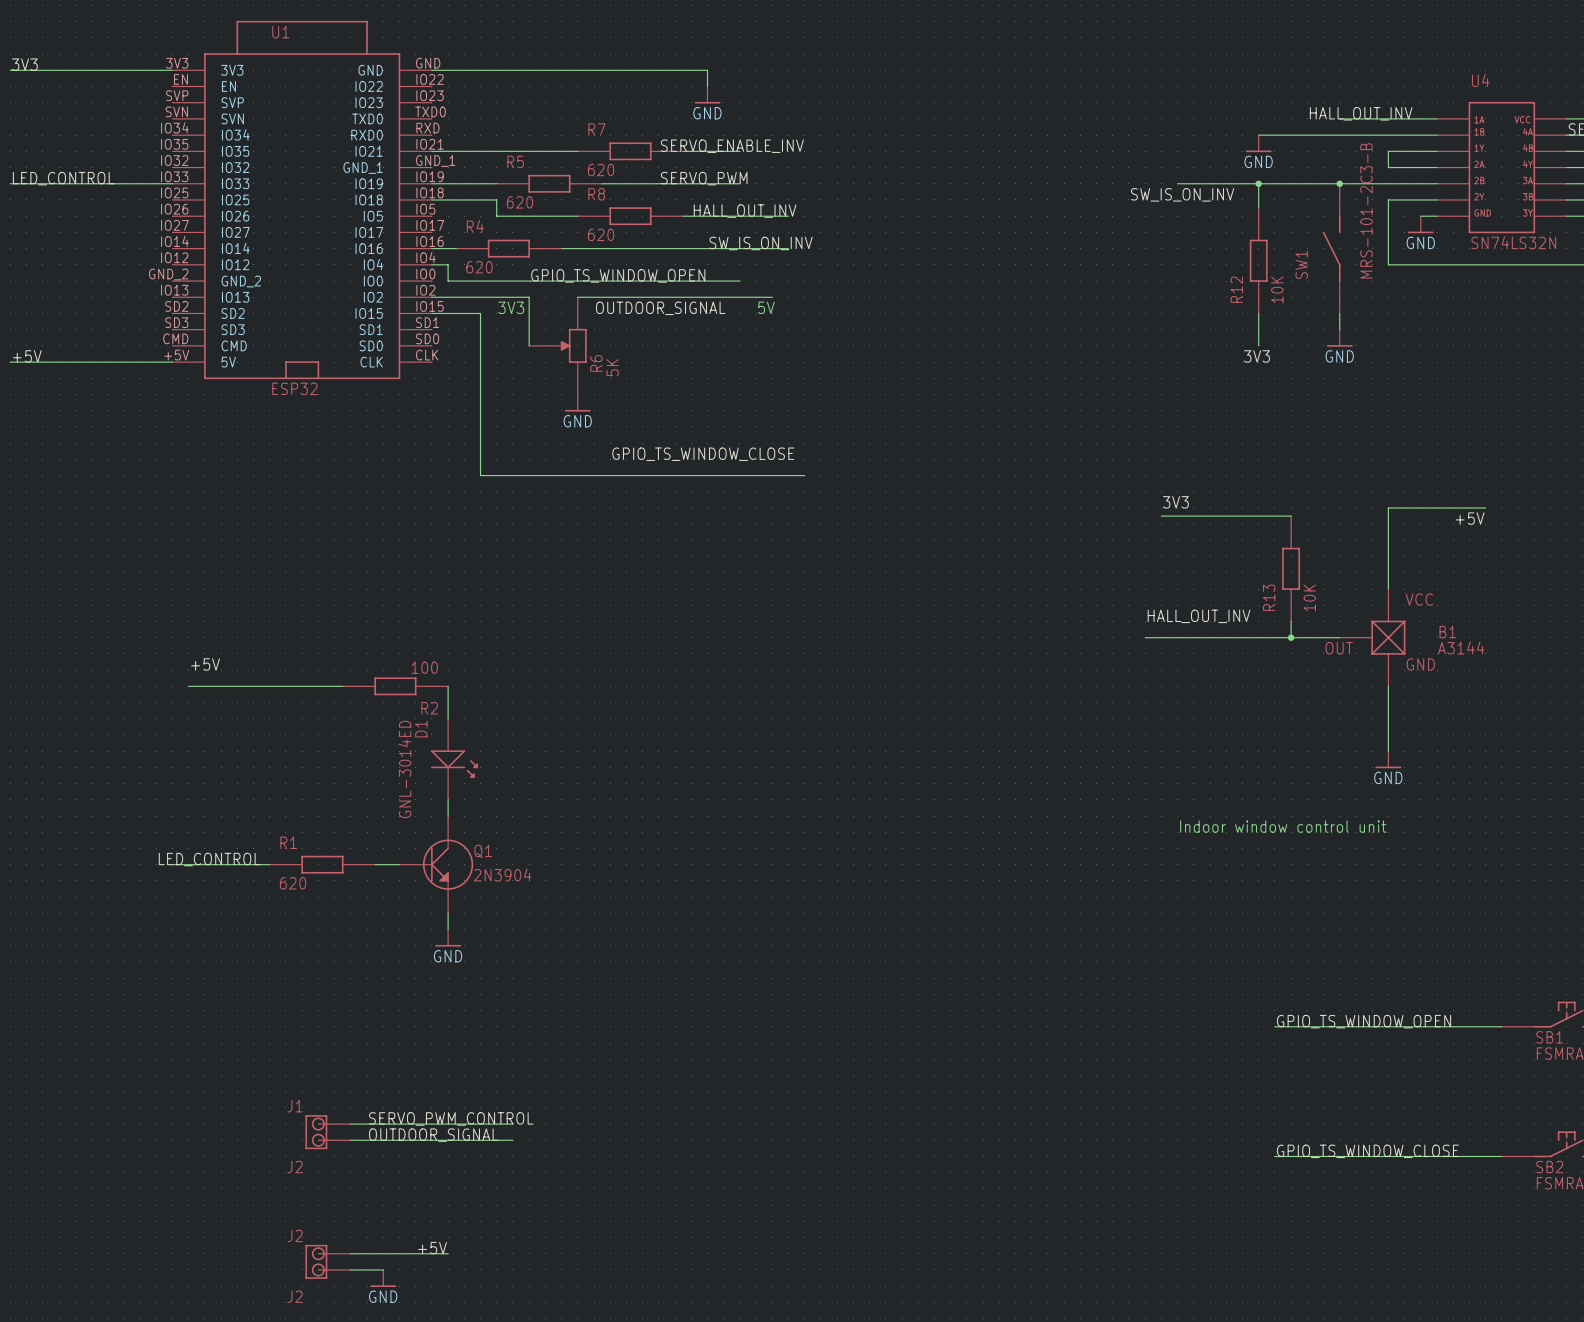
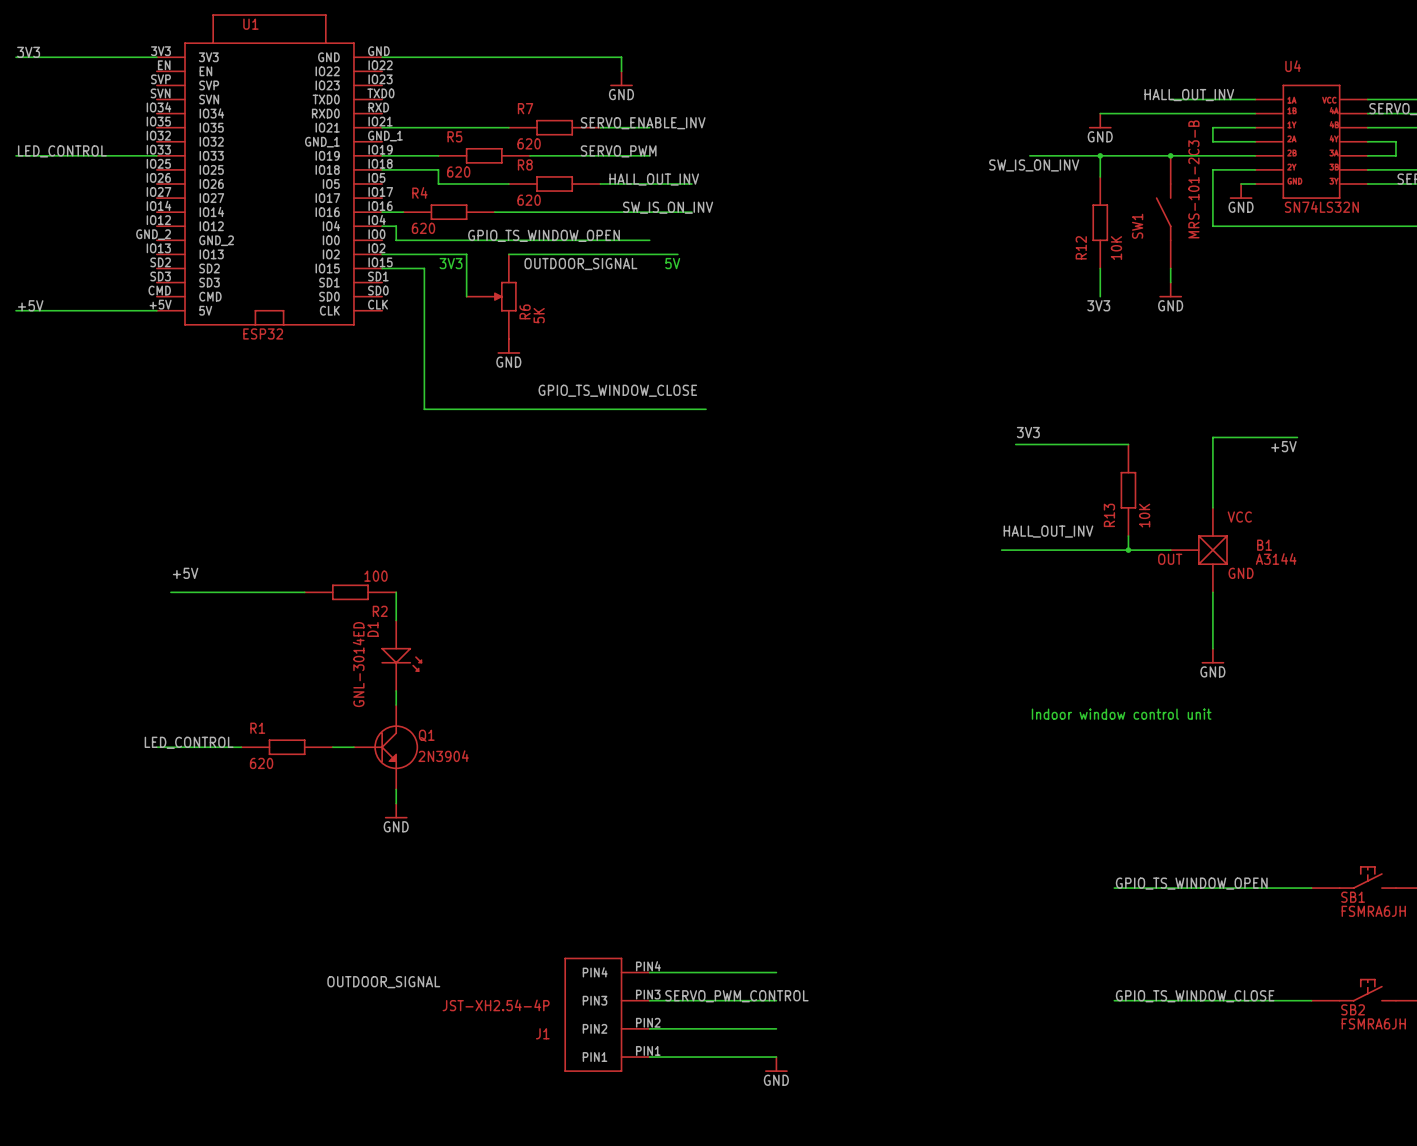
J1 name position: J1 (295, 1106) -> J1 (542, 1033)
J1 symbol: [305, 1115, 351, 1150] -> [564, 957, 650, 1072]
label: SERVO_PWM_CONTROL (451, 1118) -> none
wire: (350, 1124) (512, 1124) -> none
wire: none -> (649, 972) (776, 972)
wire: (350, 1140) (512, 1140) -> none
label: none -> SERVO_PWM_CONTROL (736, 996)
wire: none -> (649, 1000) (776, 1000)
J1 value: J2 (295, 1167) -> JST-XH2.54-4P (496, 1005)
wire: none -> (649, 1028) (776, 1028)
wire: none -> (649, 1057) (776, 1057)
power symbol: none -> GND (776, 1064)
label: +5V (432, 1248) -> none
wire: (350, 1253) (448, 1253) -> none
J2: J2 (328, 1261) -> none
wire: (350, 1269) (383, 1269) -> none
power symbol: GND (383, 1278) -> none

